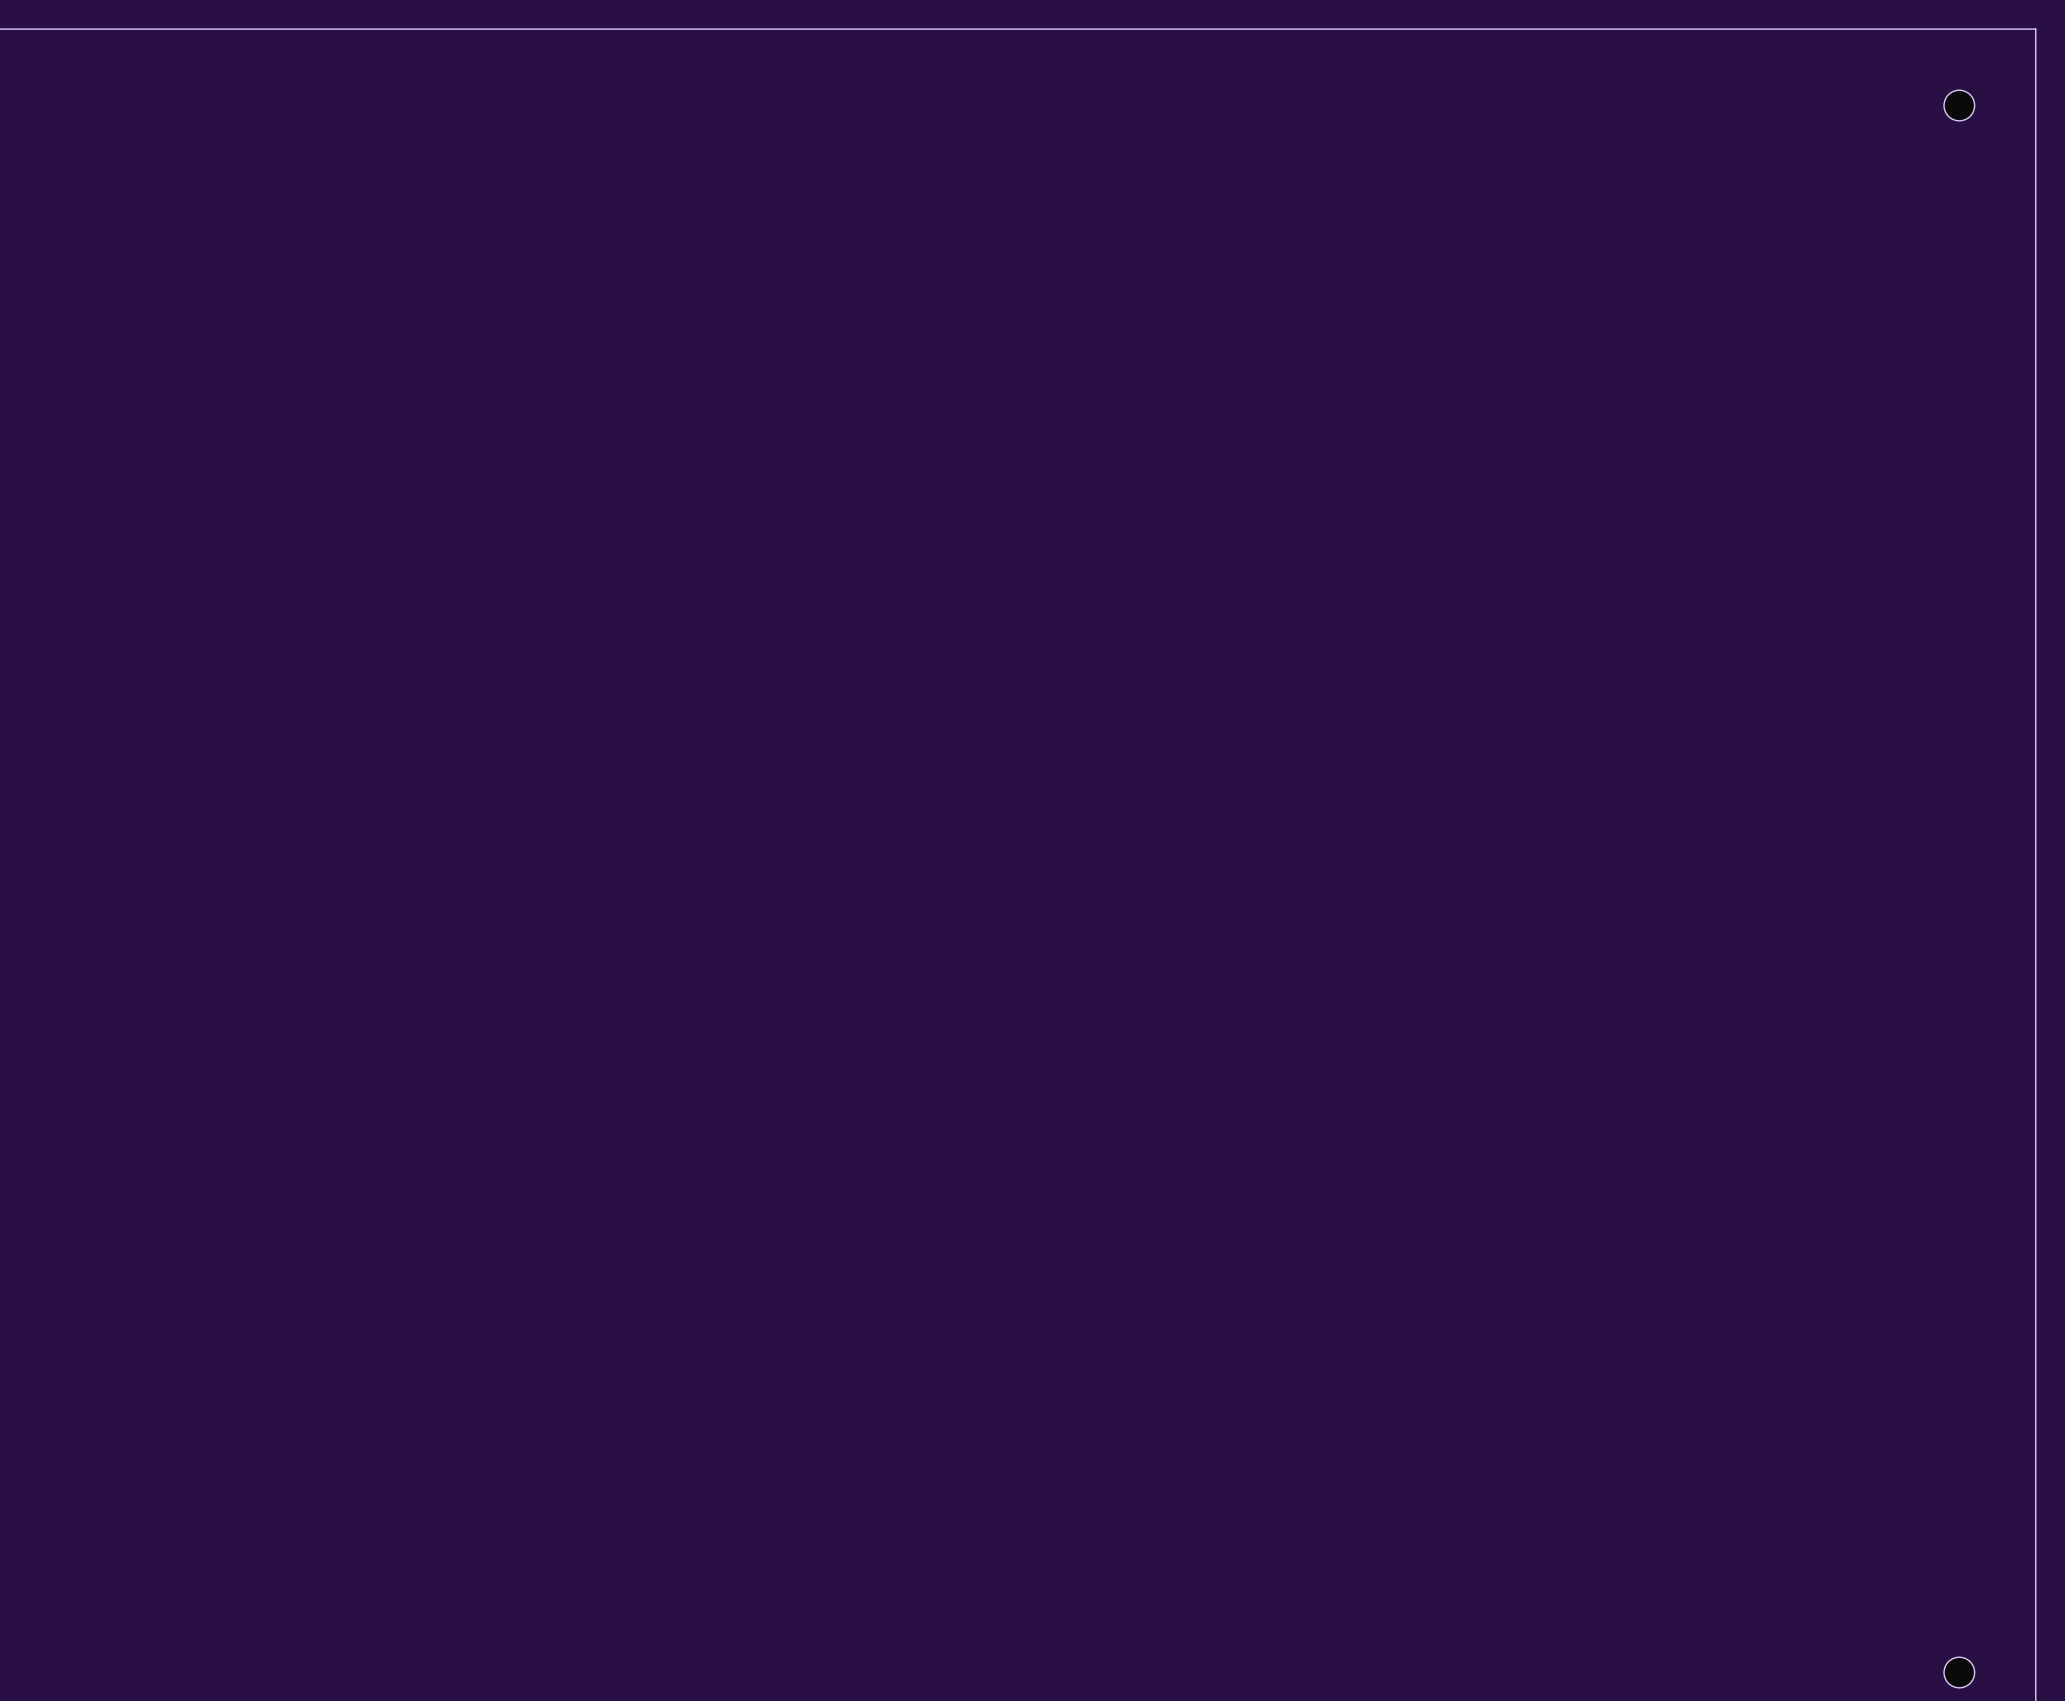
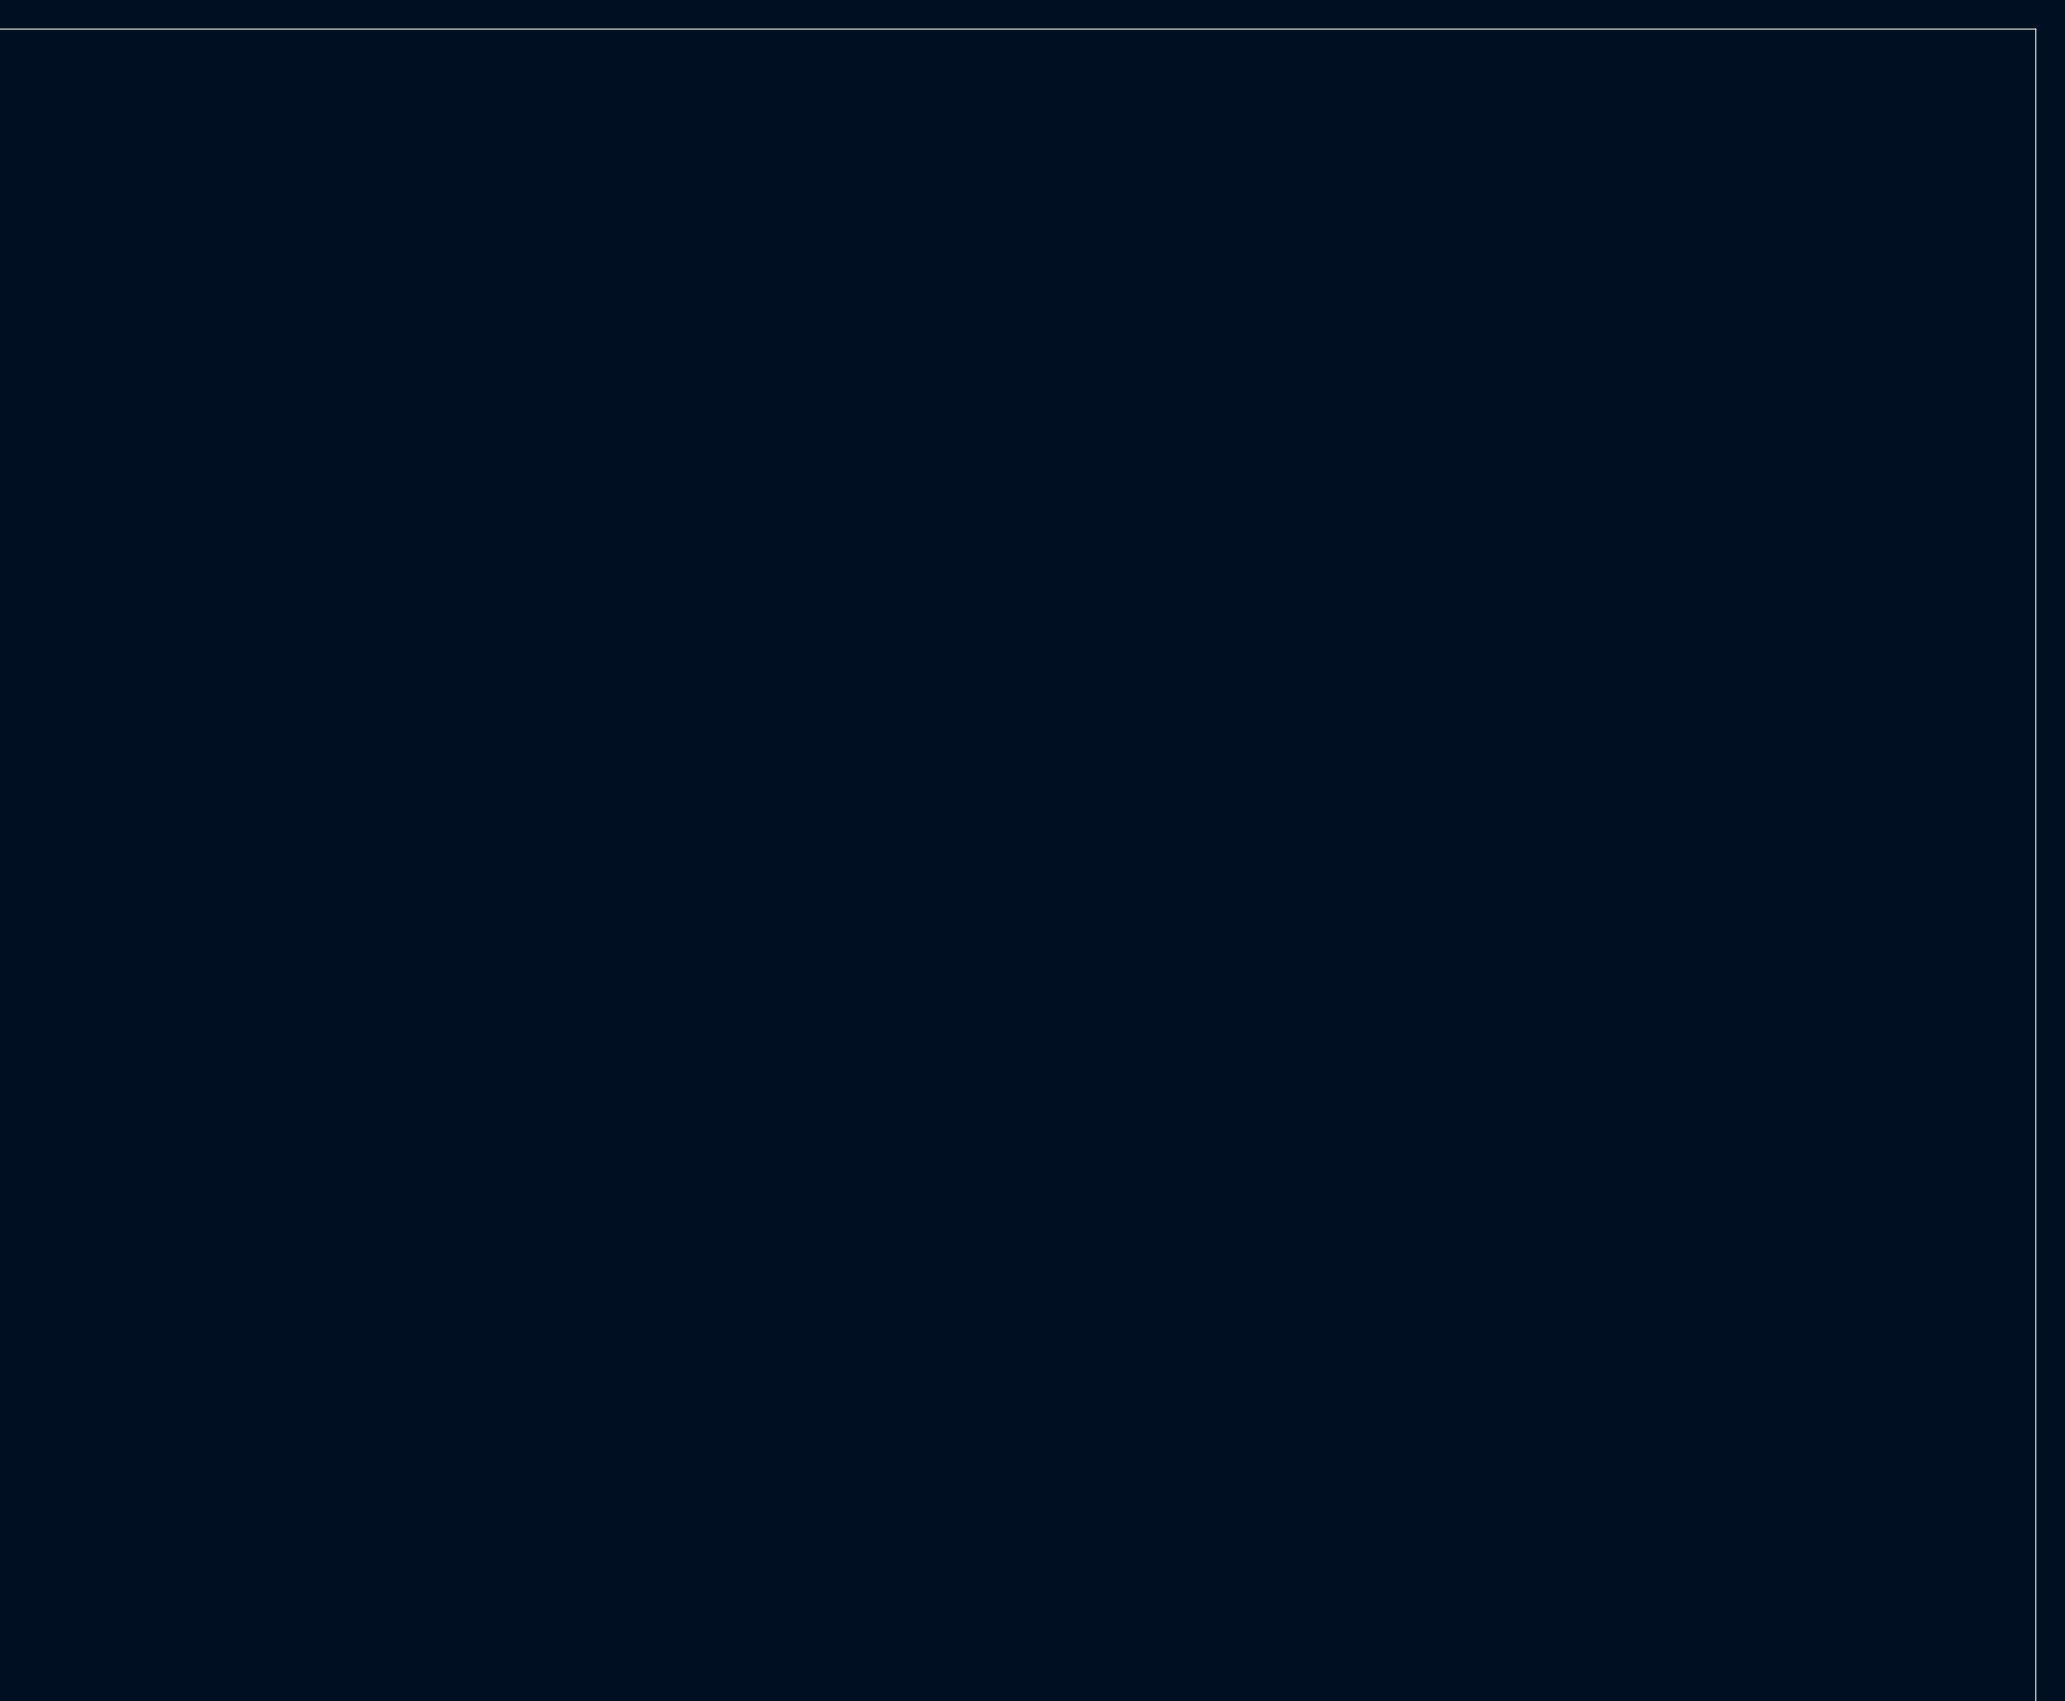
part: (1959, 105) -> none
part: (1959, 1672) -> none

